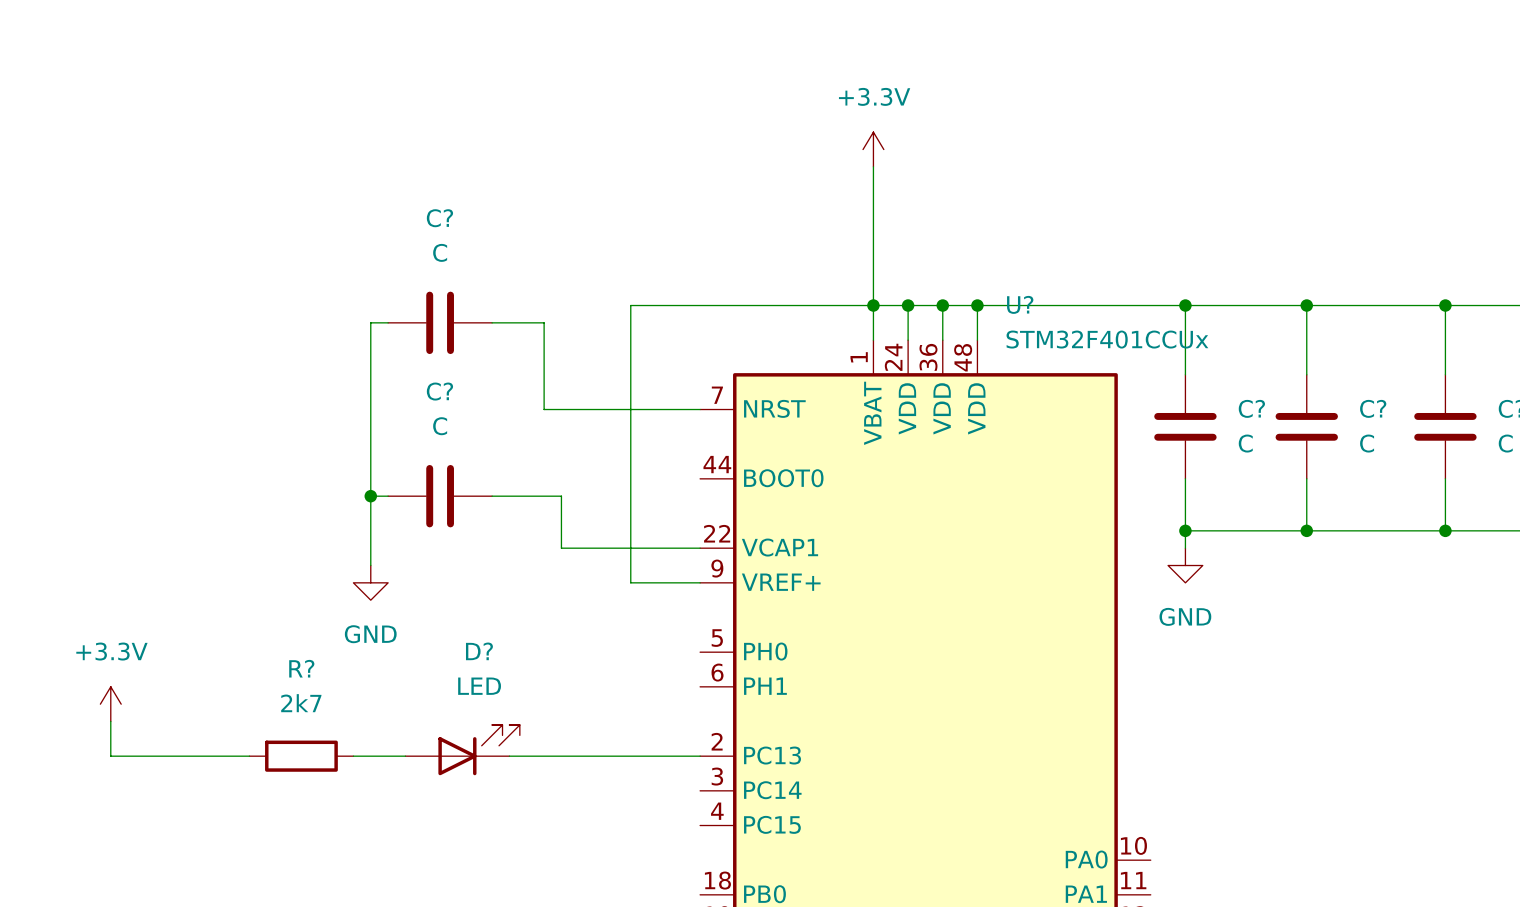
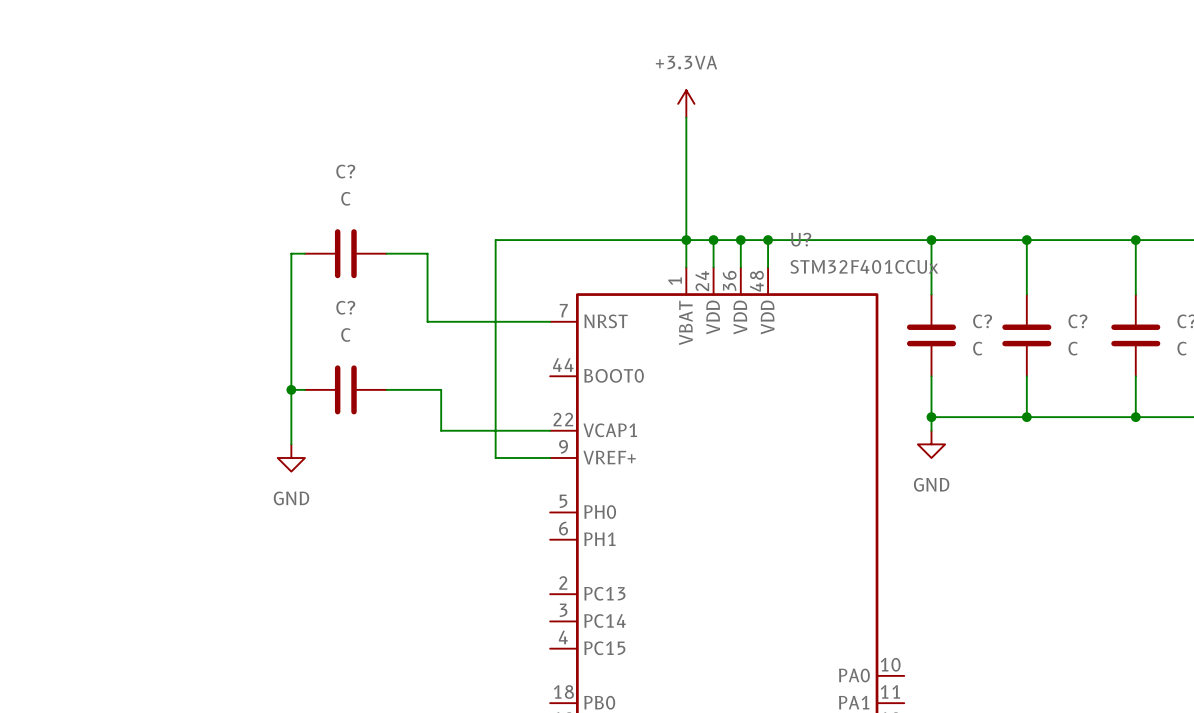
power symbol: none -> +3.3VA (686, 103)
power symbol: +3.3V (873, 149) -> none
power symbol: +3.3V (110, 704) -> none
wire: (110, 721) (110, 756) (249, 756) -> none
D?: LED (462, 750) -> none
R?: 2k7 (301, 756) -> none
wire: (353, 756) (405, 756) -> none
wire: (509, 756) (700, 756) -> none

